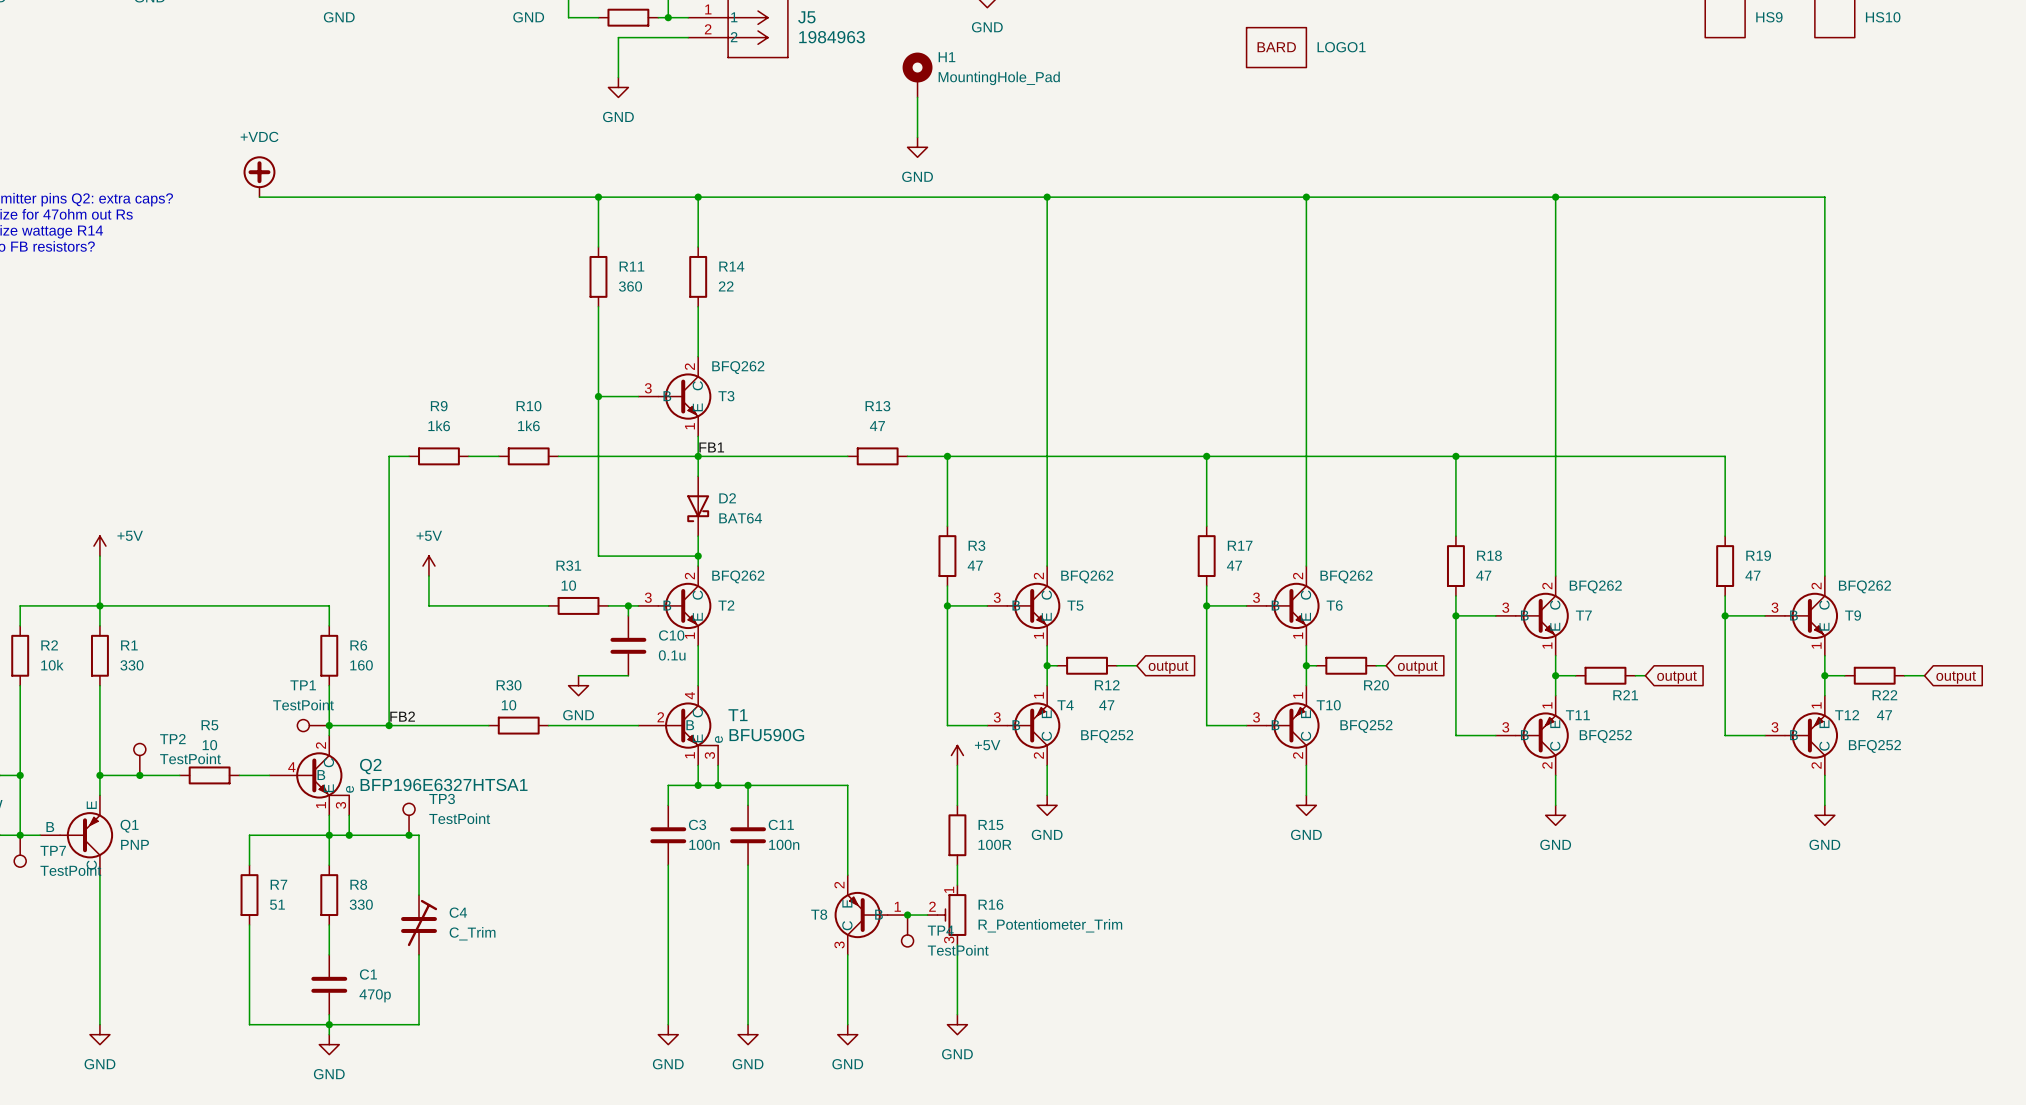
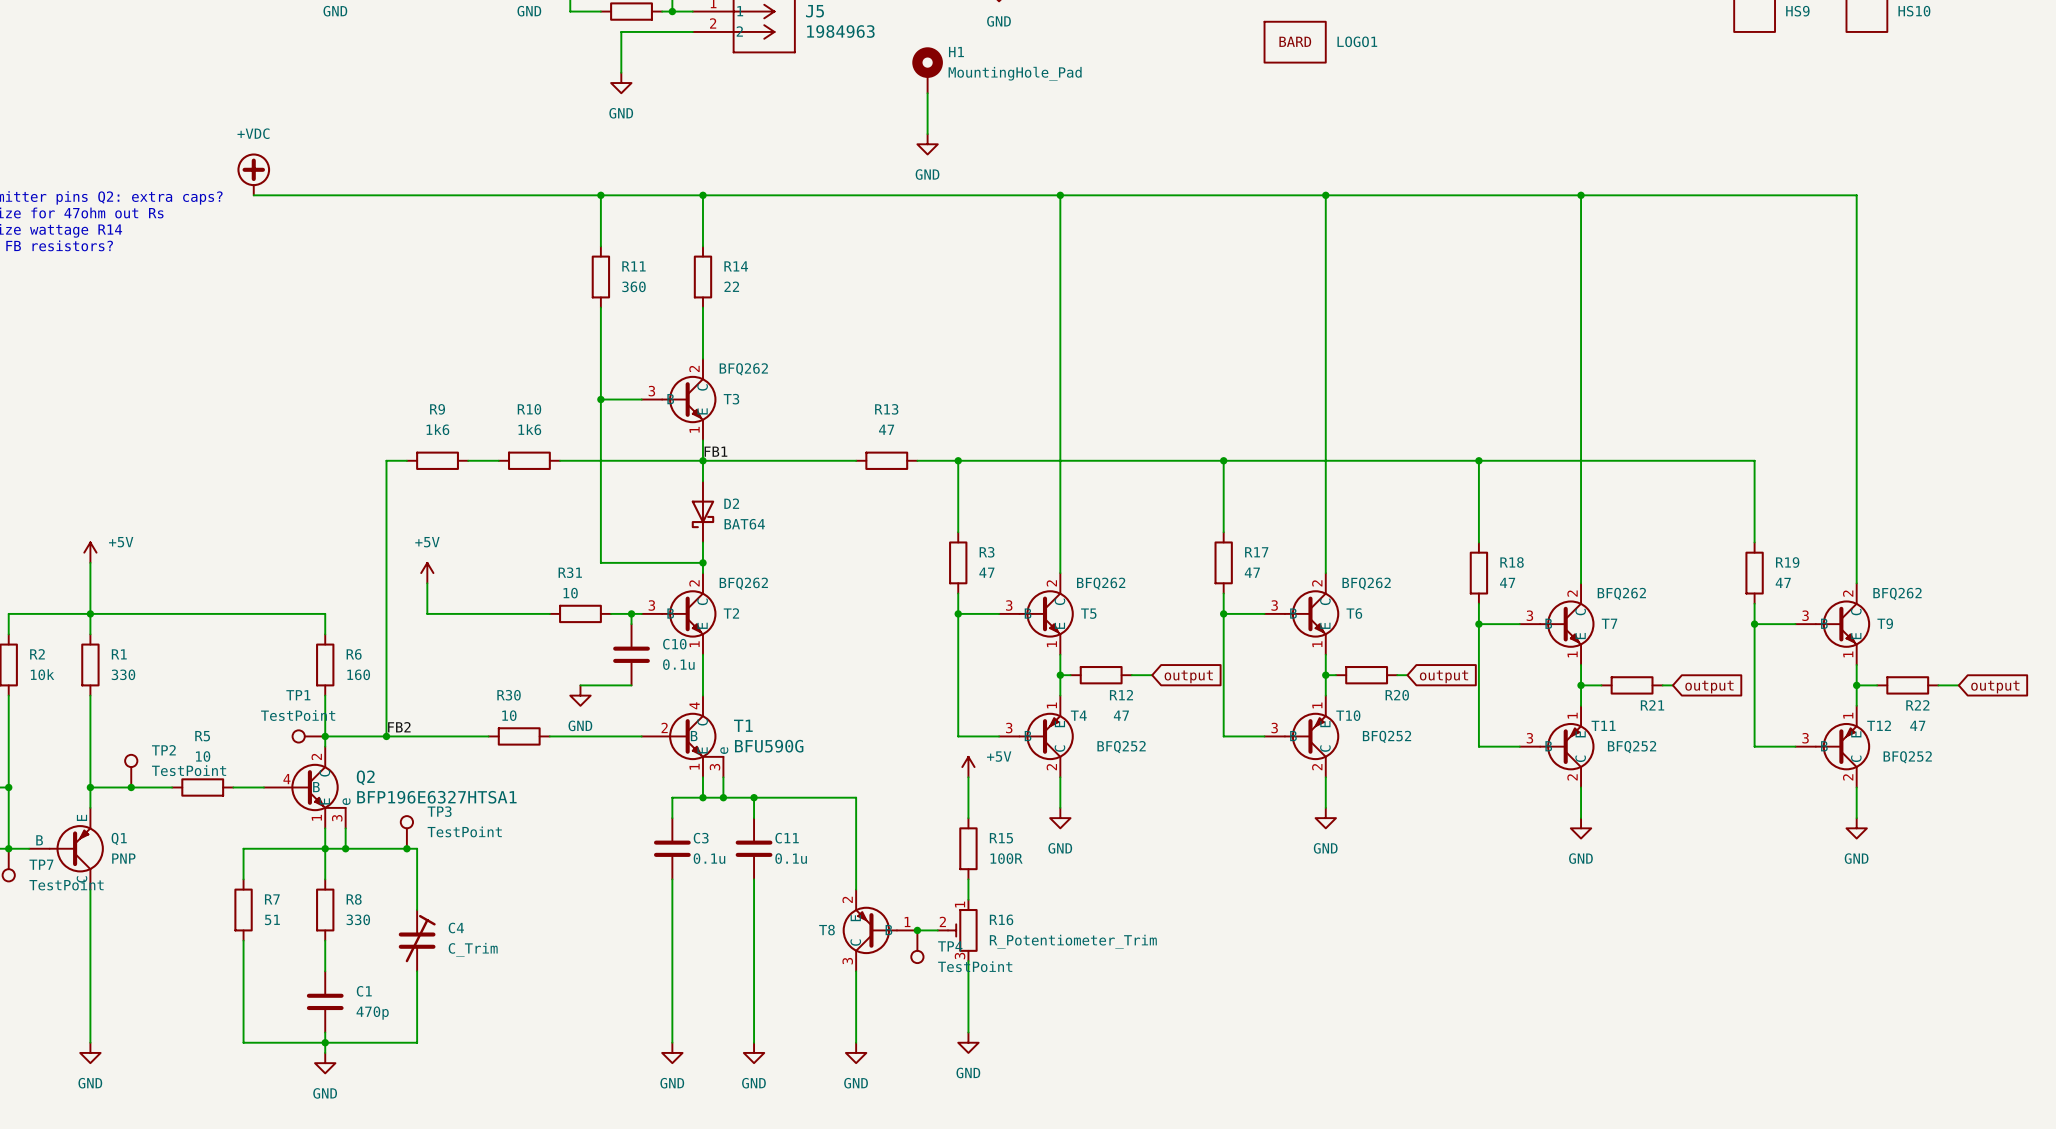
C3 value: 100n (704, 844) -> 0.1u (709, 858)
C11 value: 100n (784, 844) -> 0.1u (791, 858)

